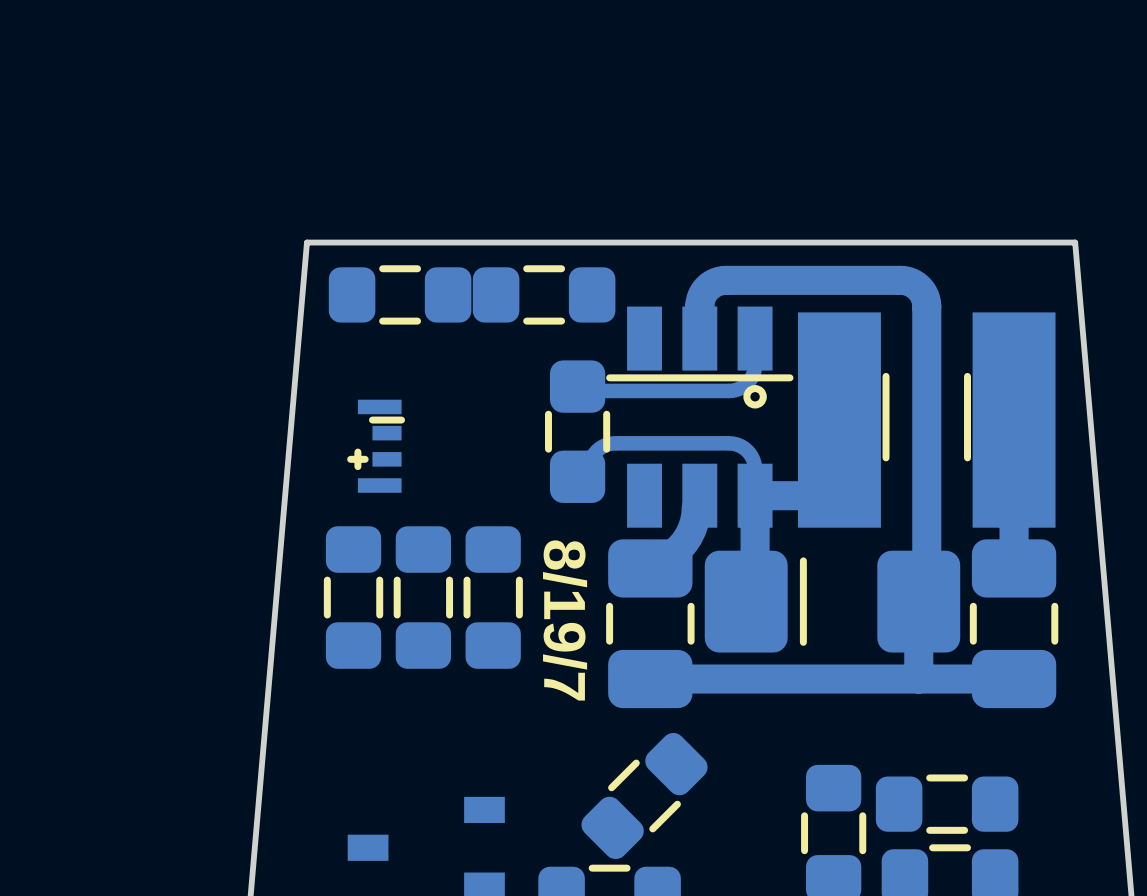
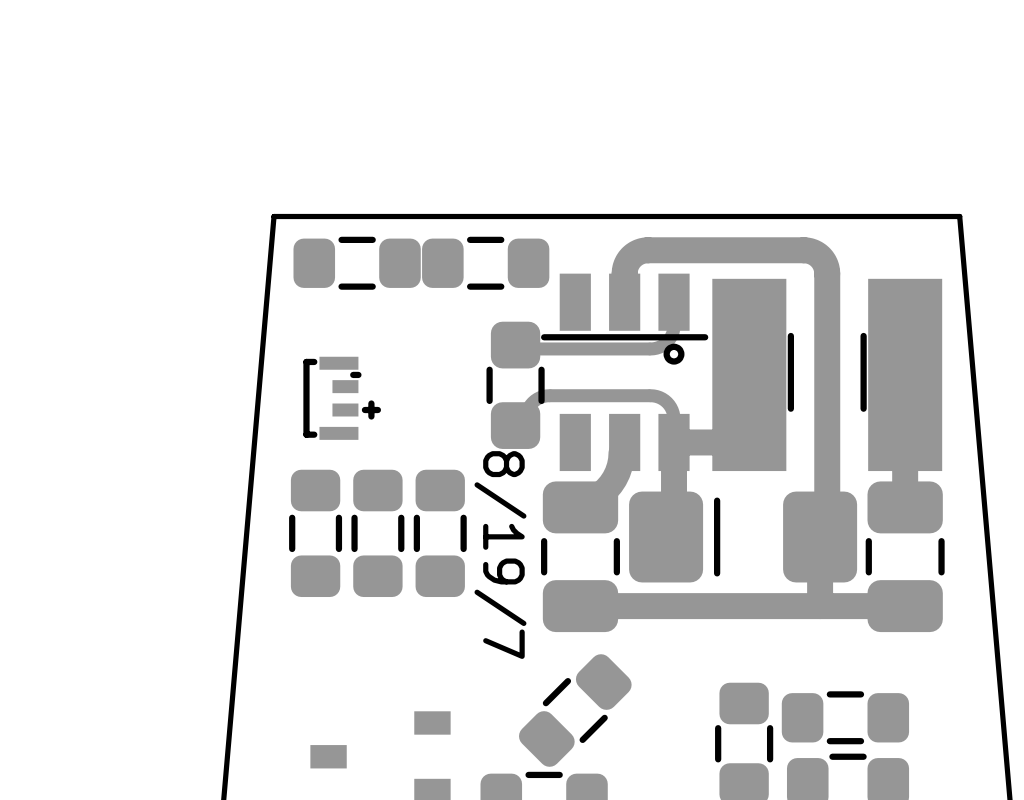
part footprint: [347, 399, 406, 493] -> [303, 356, 382, 440]

